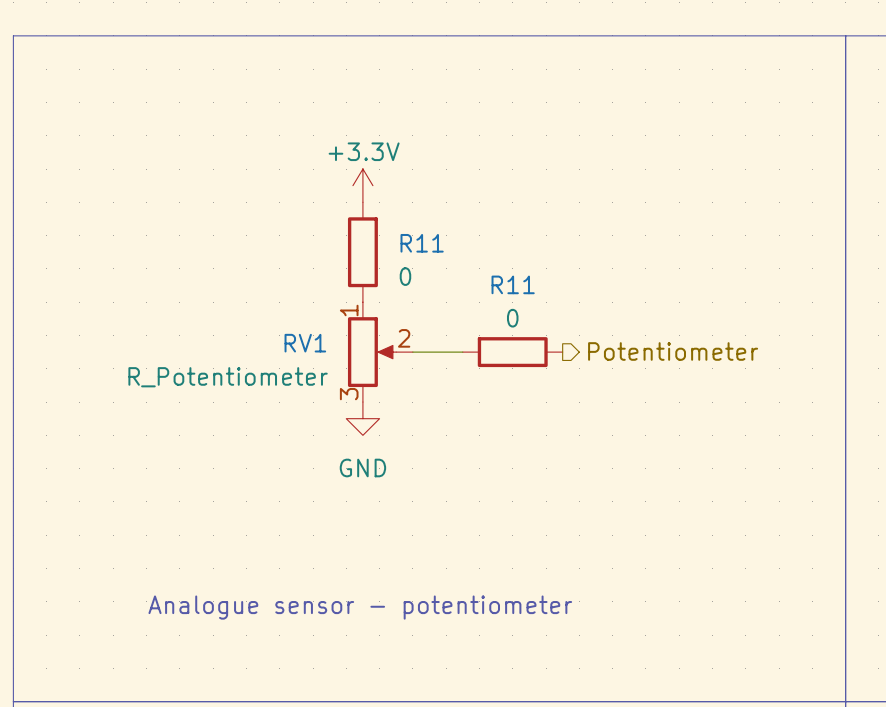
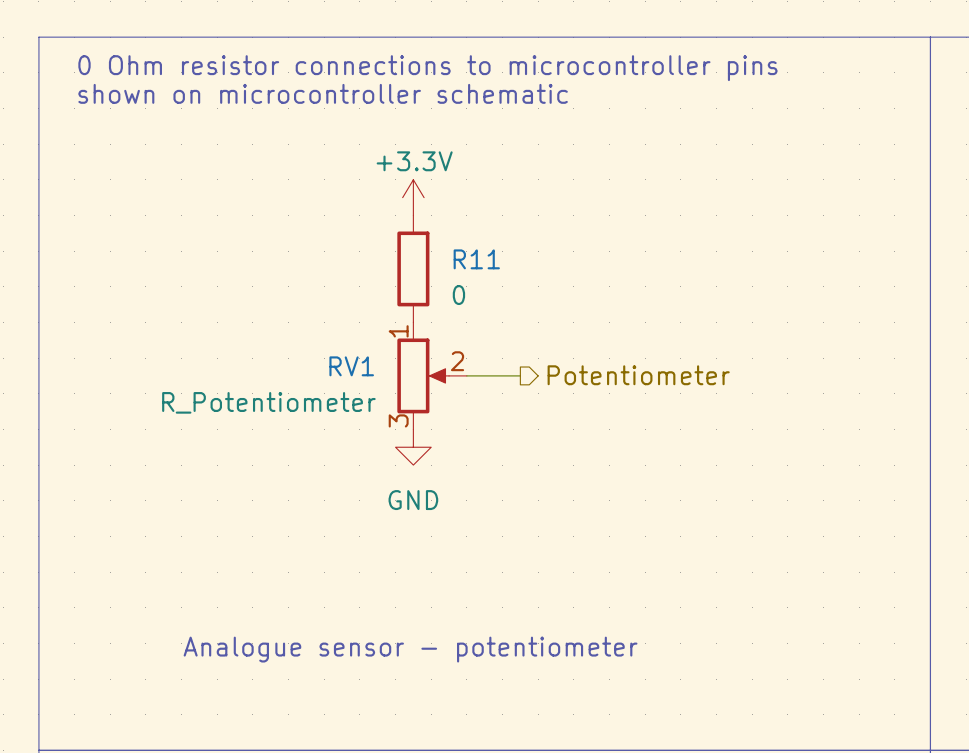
text: none -> 0 Ohm resistor connections to microcontroller pins (427, 68)
text: none -> shown on microcontroller schematic (323, 93)
hierarchical label position: Potentiometer (673, 351) -> Potentiometer (638, 375)
R11: 0 (512, 352) -> none

